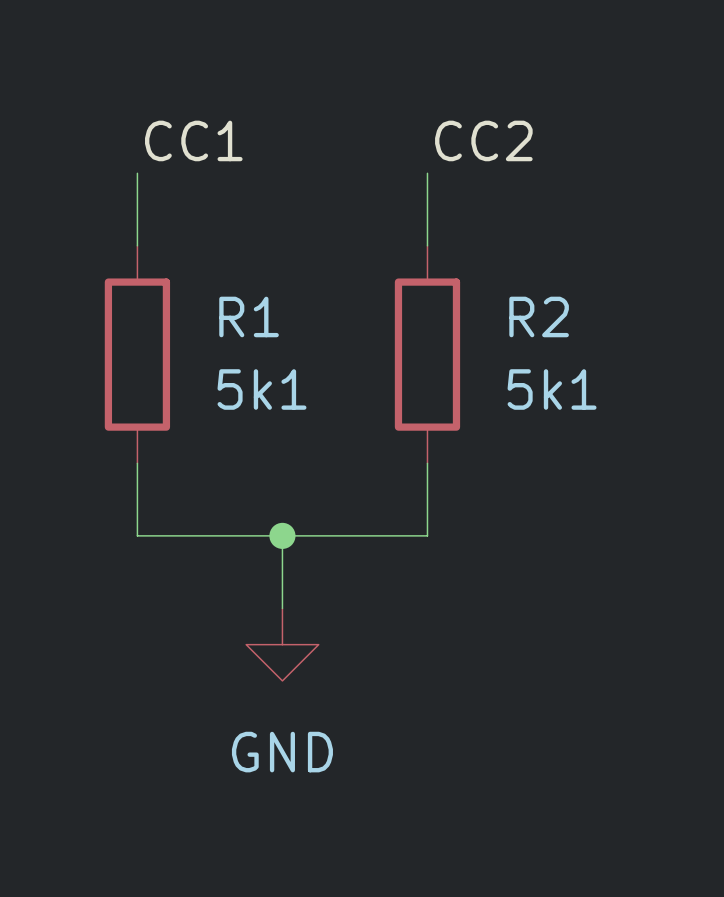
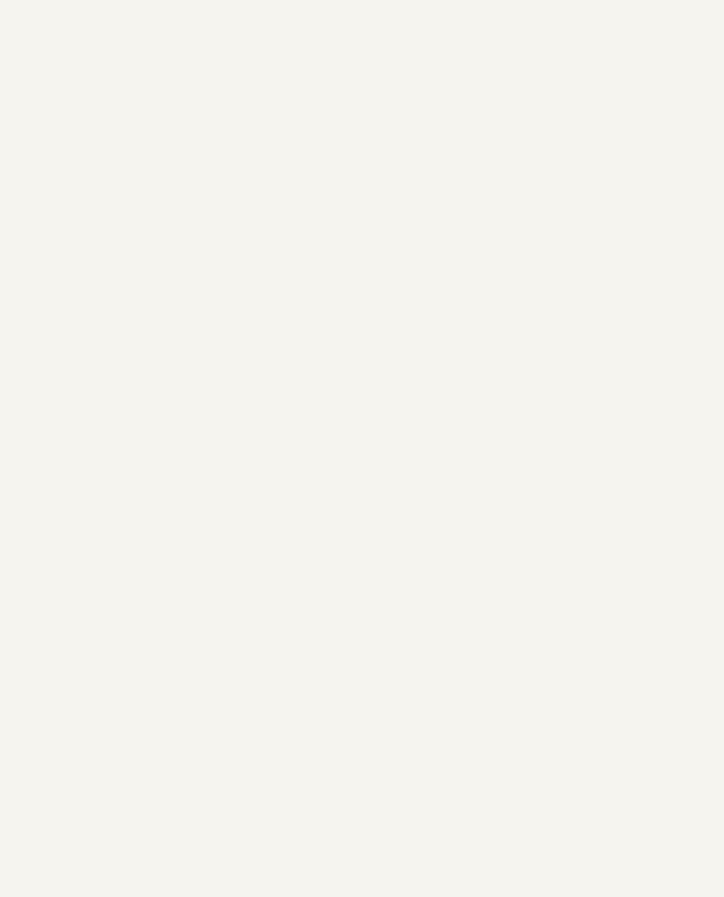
label: CC1 (193, 140) -> none
label: CC2 (483, 140) -> none
wire: (137, 173) (137, 245) -> none
wire: (427, 173) (427, 245) -> none
R1: 5k1 (137, 354) -> none
R2: 5k1 (427, 354) -> none
wire: (137, 463) (137, 535) (427, 535) (427, 463) -> none
wire: (282, 535) (282, 608) -> none
junction: (282, 535) -> none
power symbol: GND (282, 644) -> none

